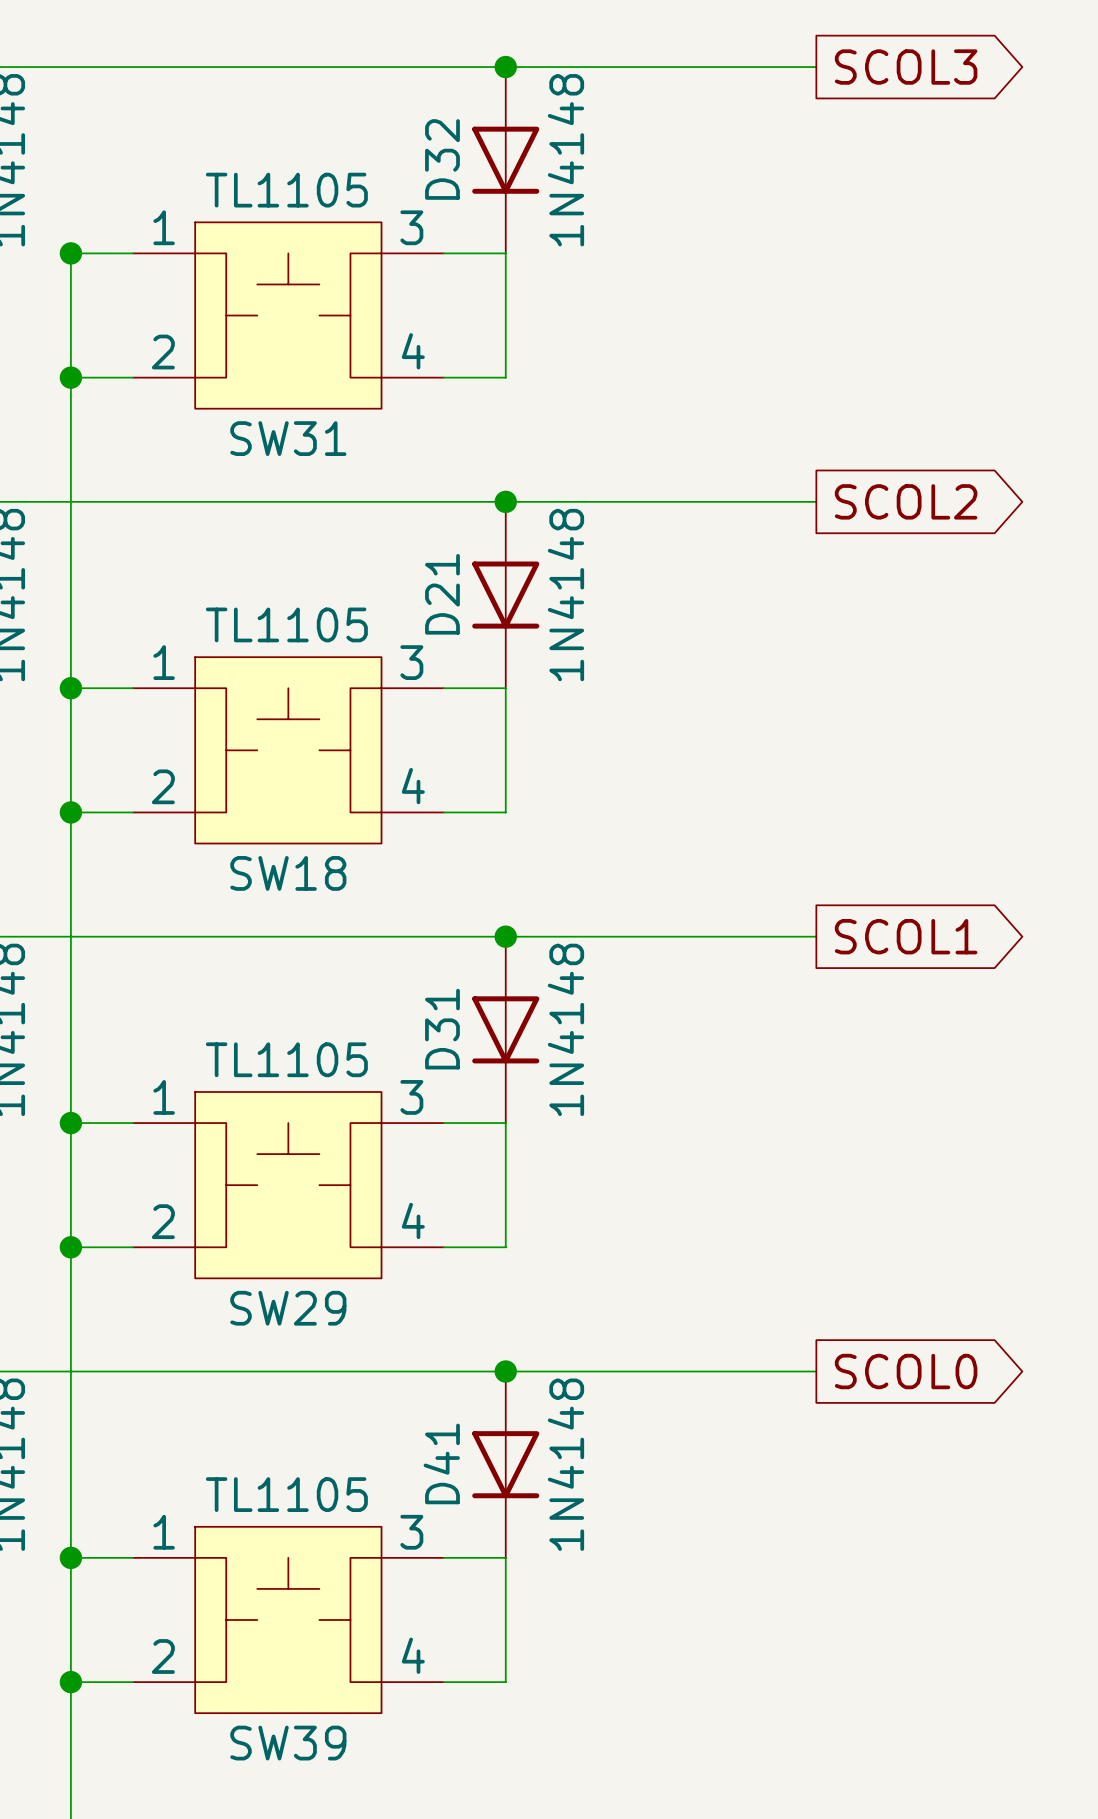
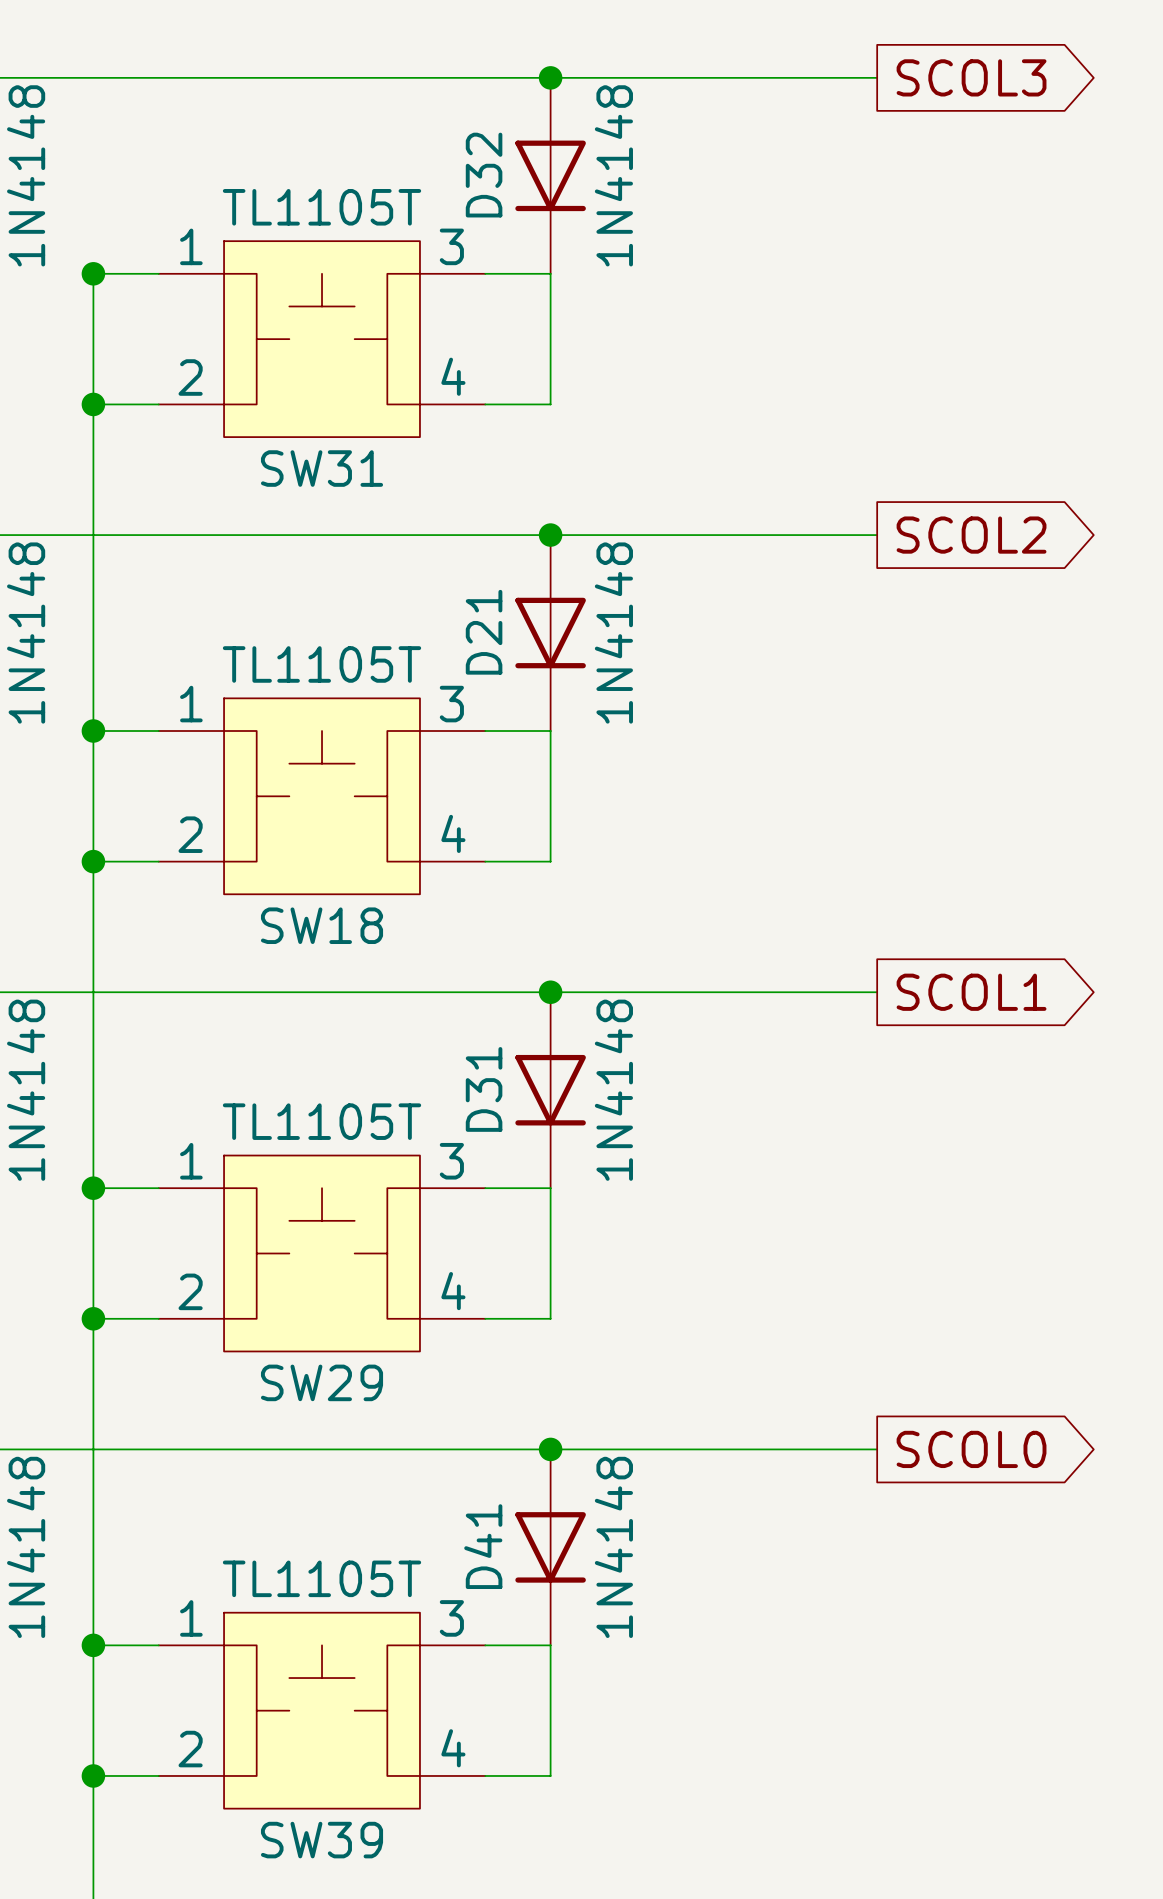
SW31 value: TL1105 (286, 190) -> TL1105T (322, 207)
SW18 value: TL1105 (286, 624) -> TL1105T (322, 664)
SW29 value: TL1105 (286, 1059) -> TL1105T (322, 1121)
SW39 value: TL1105 (286, 1494) -> TL1105T (322, 1578)

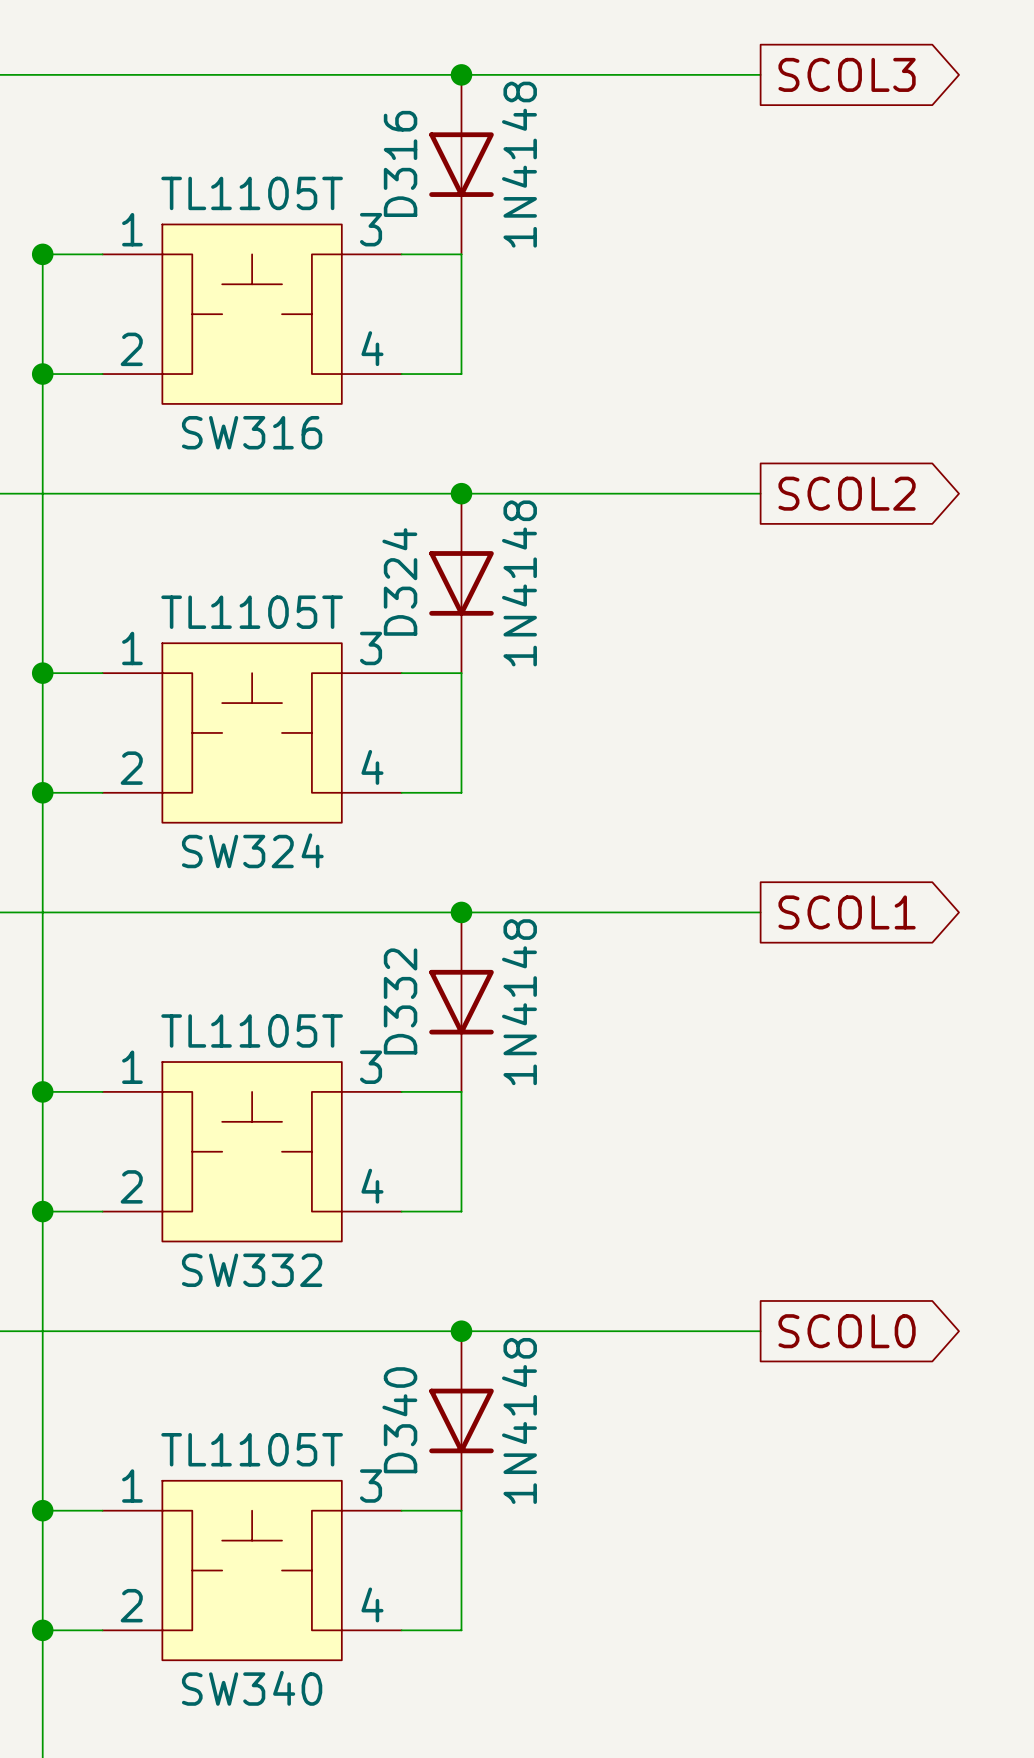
D32 name: D32 (484, 175) -> D316 (400, 163)
SW31 name: SW31 (322, 468) -> SW316 (252, 432)
D21 name: D21 (484, 632) -> D324 (399, 581)
SW18 name: SW18 (322, 925) -> SW324 (252, 850)
D31 name: D31 (484, 1089) -> D332 (400, 1001)
SW29 name: SW29 (322, 1382) -> SW332 (252, 1270)
D41 name: D41 (483, 1546) -> D340 (399, 1420)
SW39 name: SW39 (322, 1840) -> SW340 (252, 1688)

